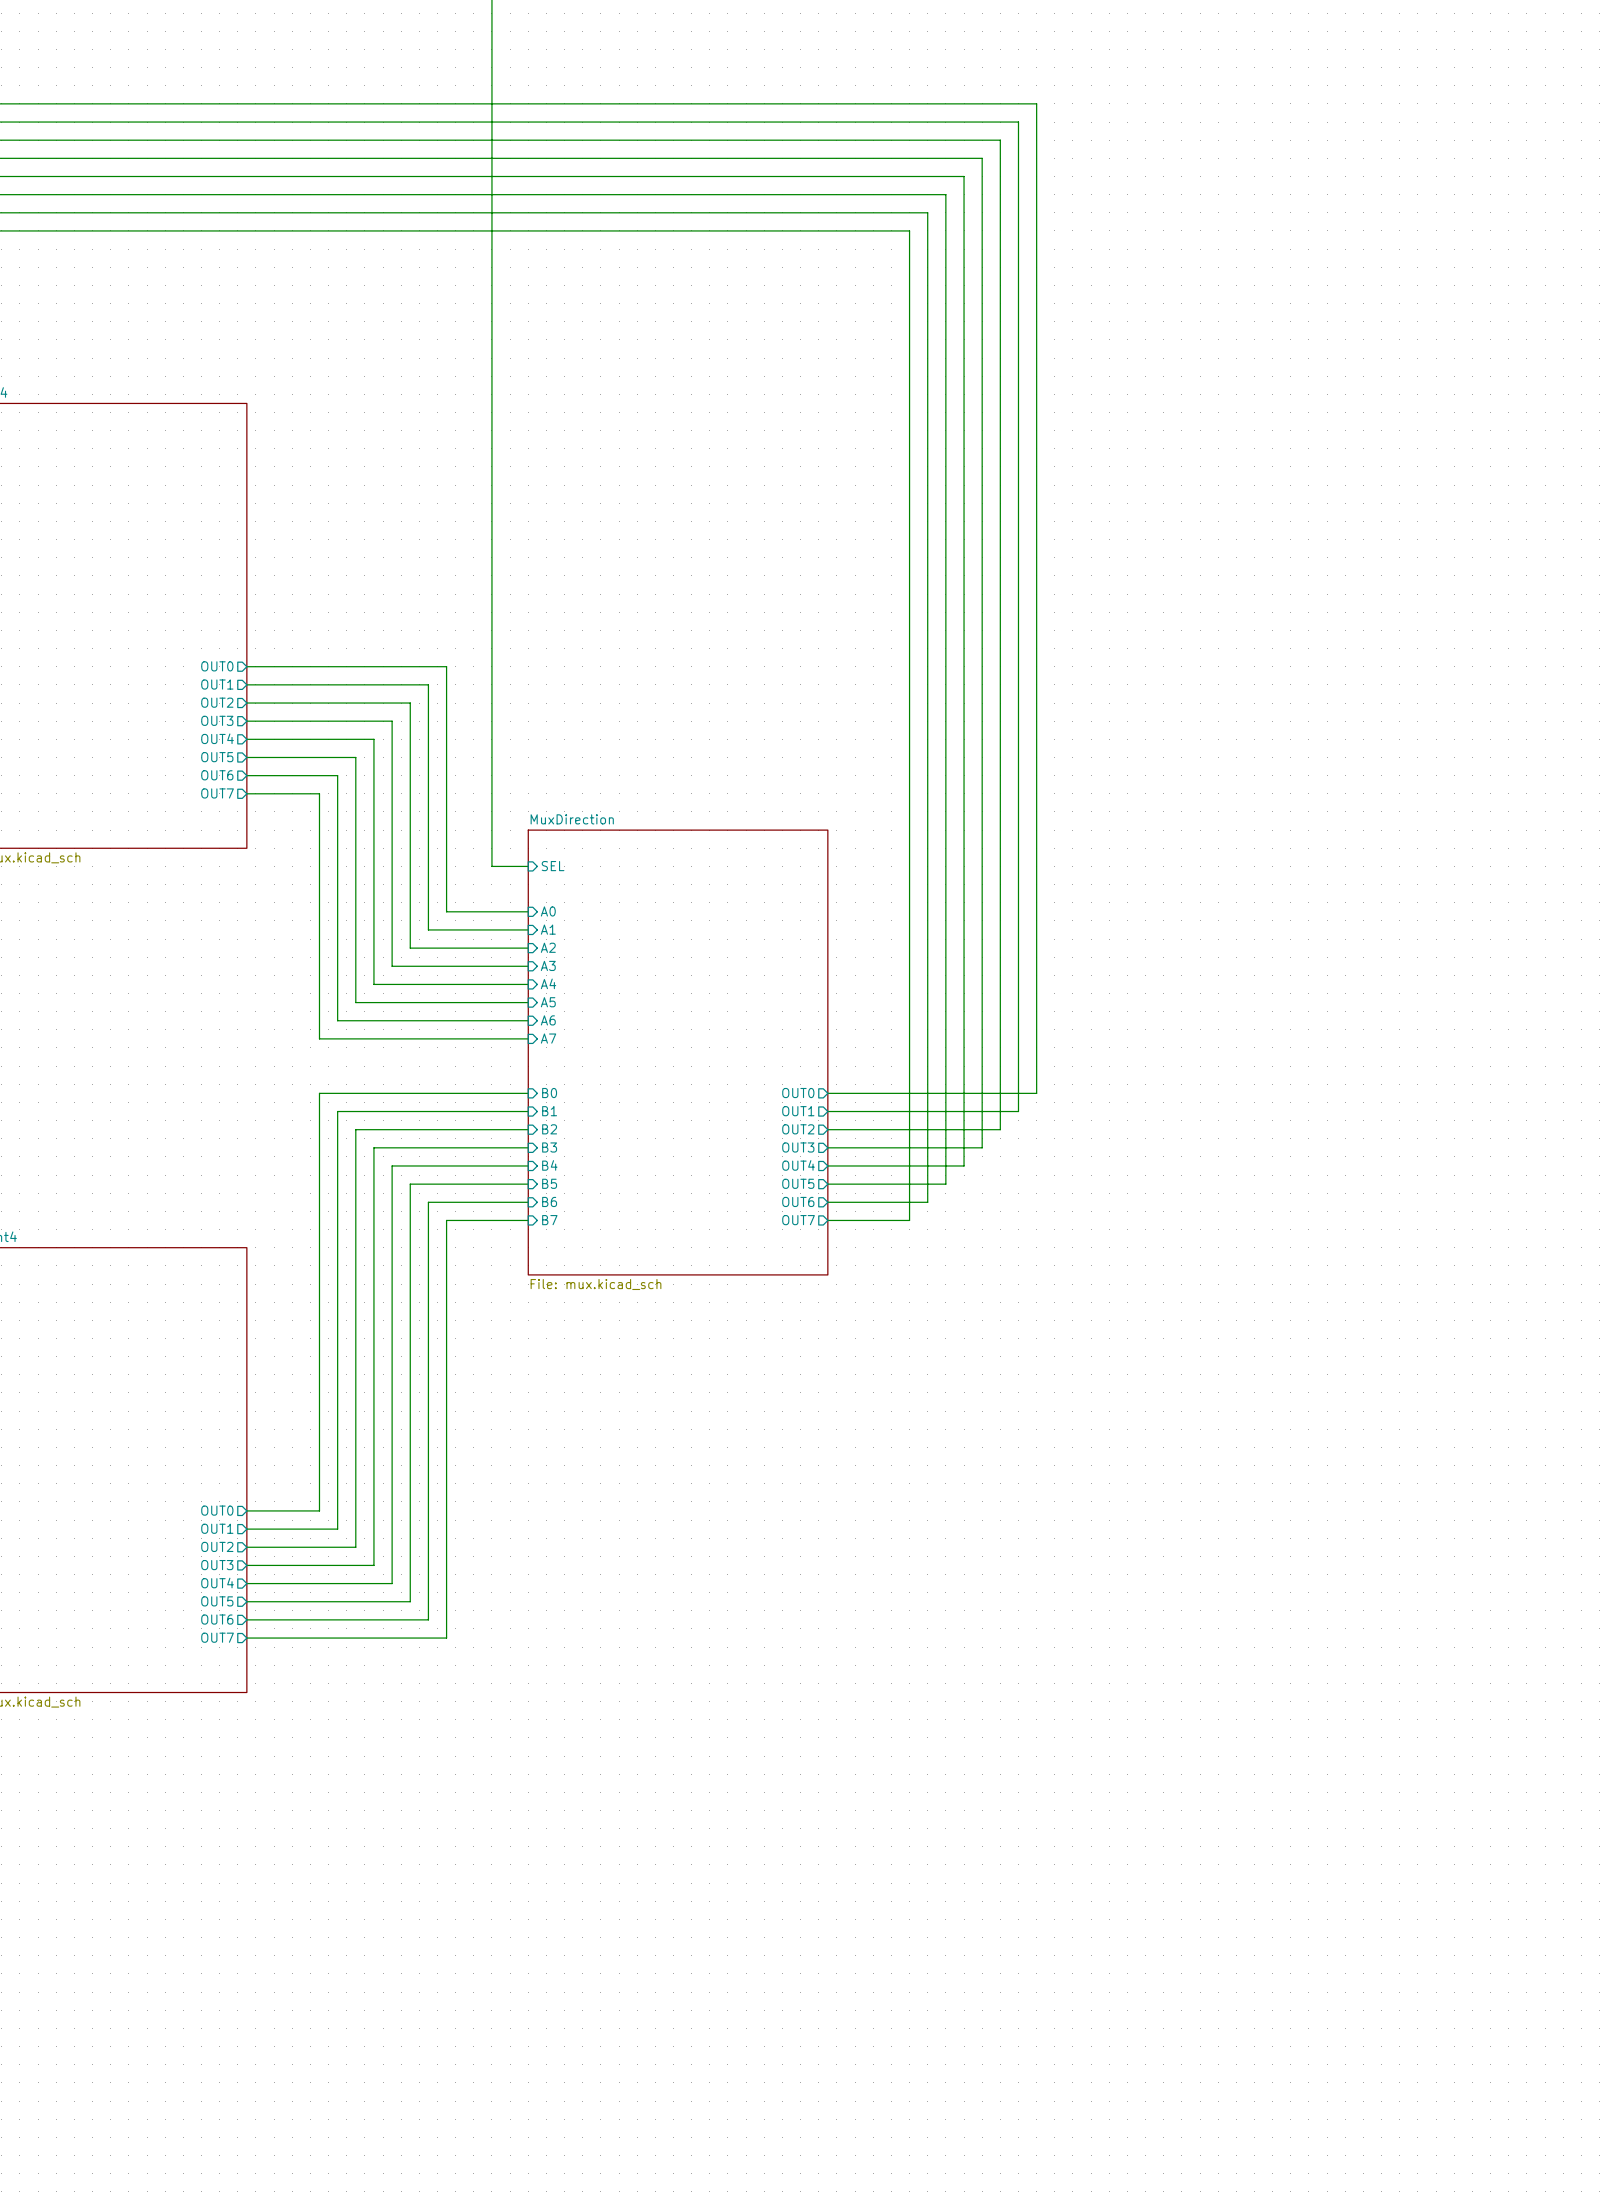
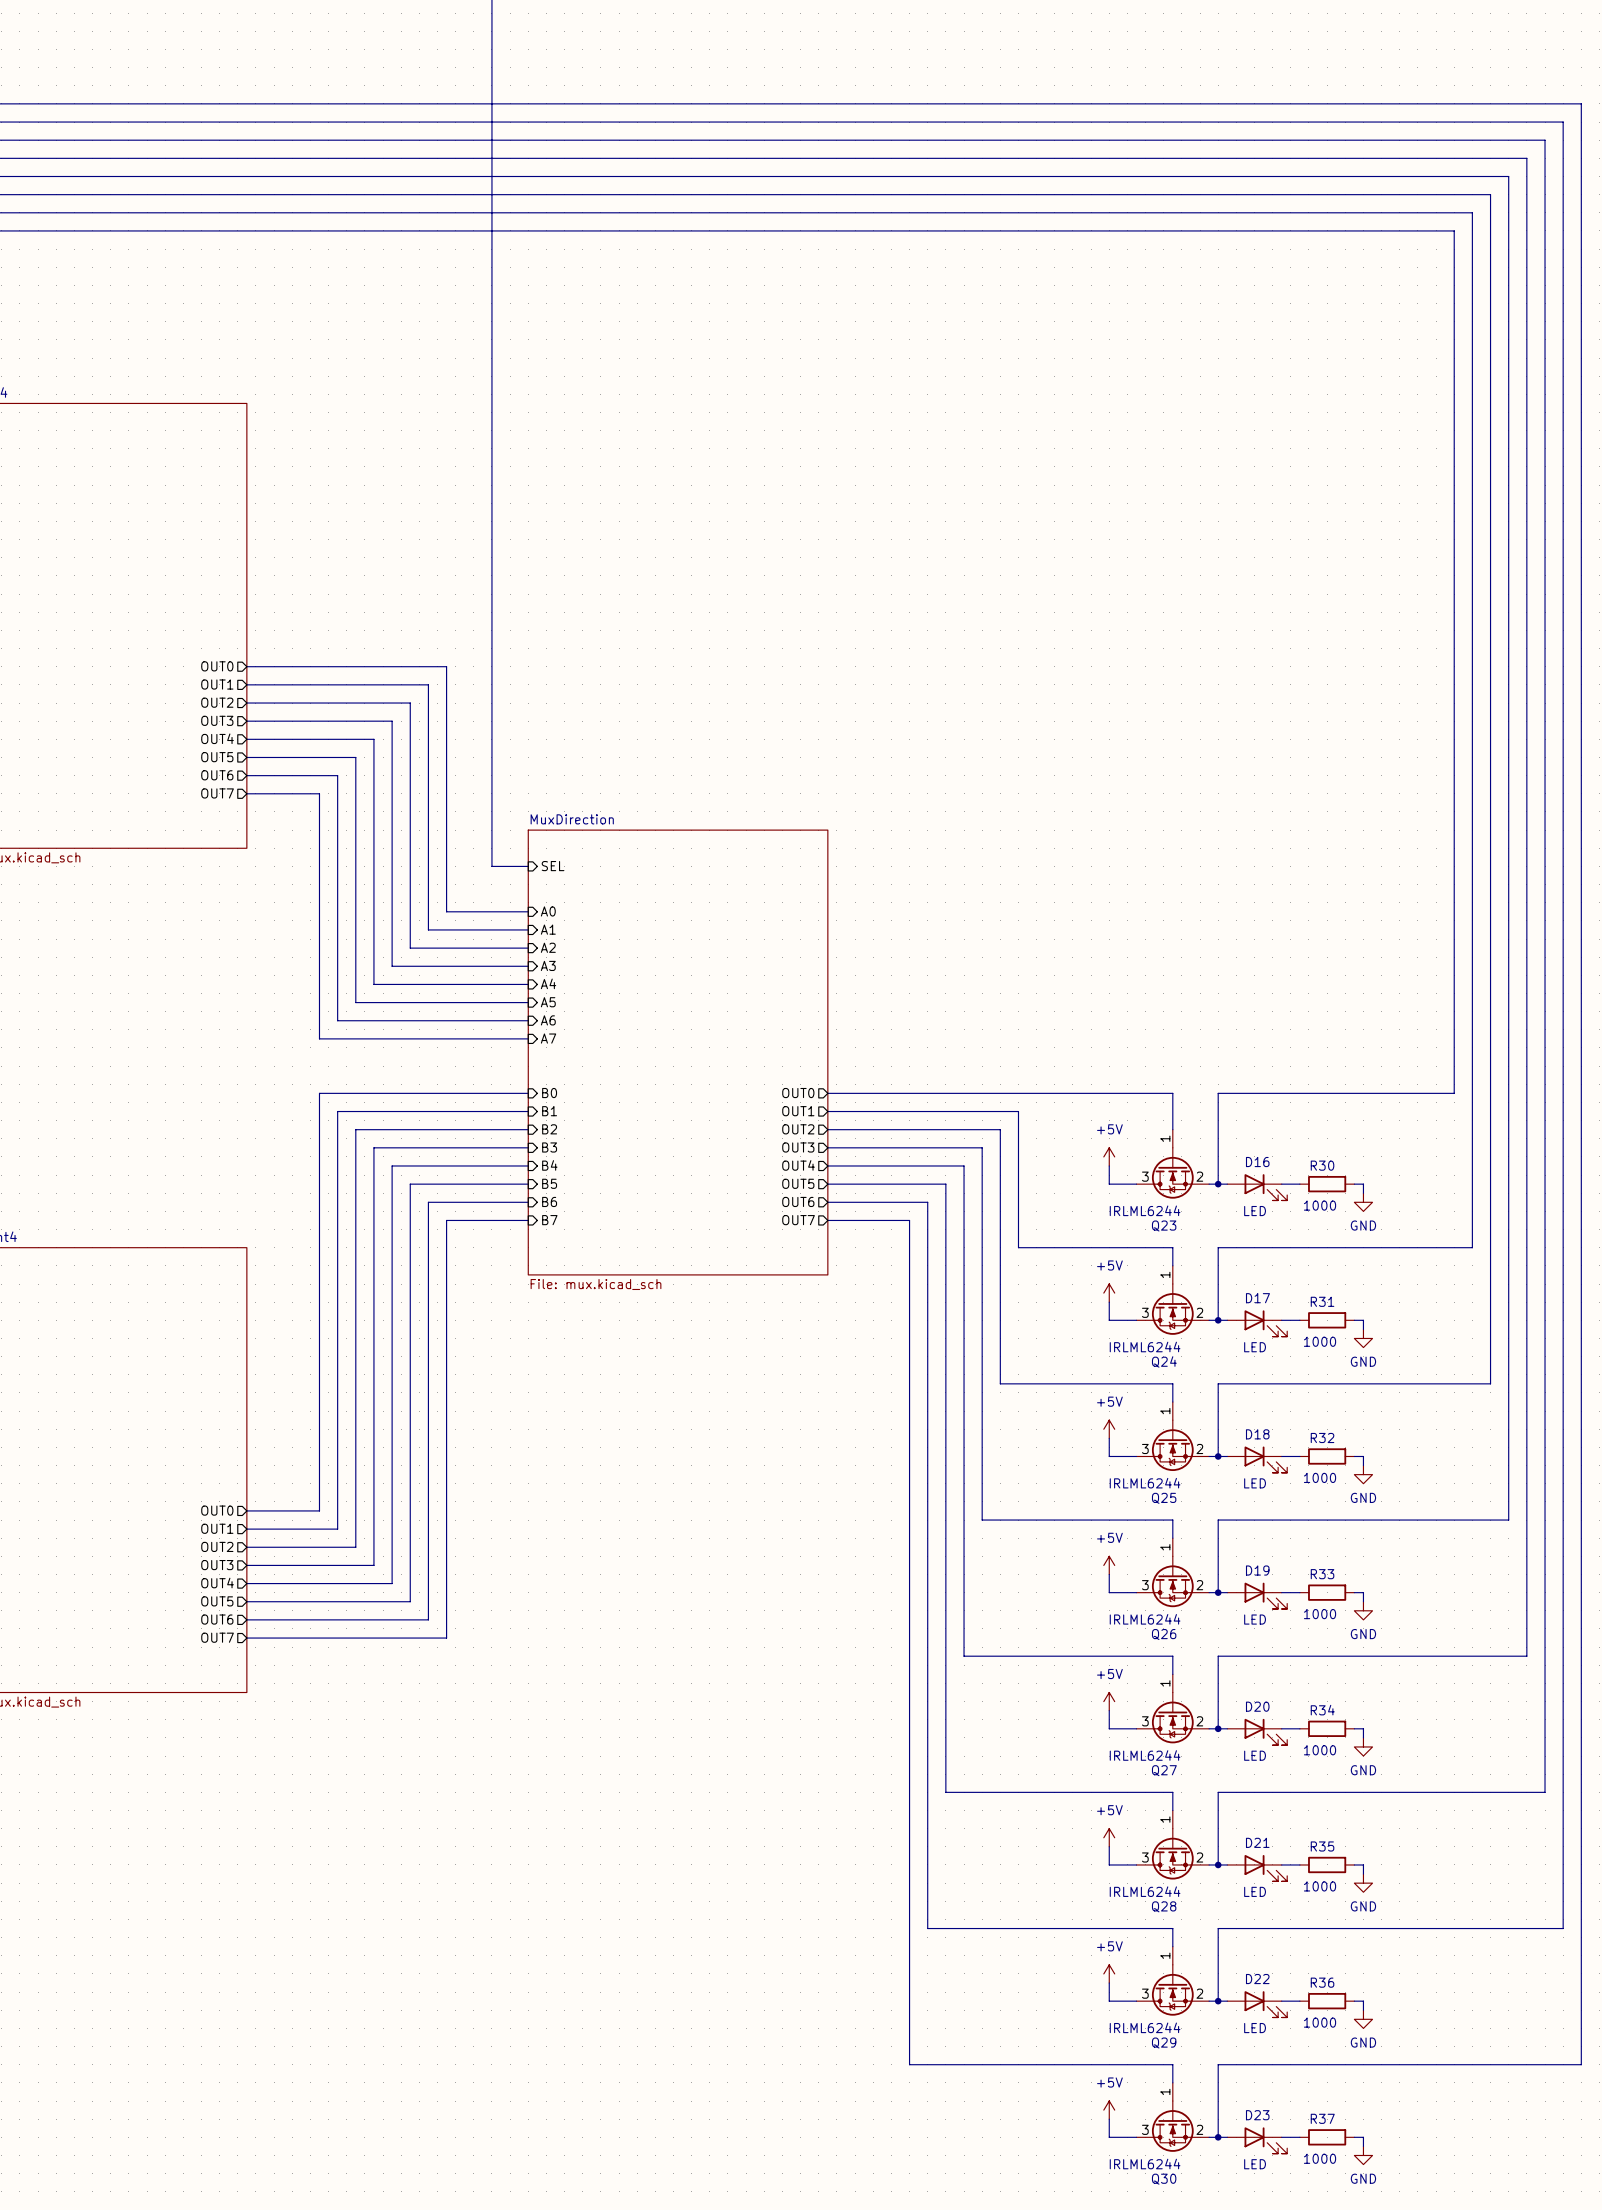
wire: (1036, 103) (1036, 1093) -> (1172, 1129) (1172, 1093) (1036, 1093)
wire: none -> (1036, 103) (1581, 103) (1581, 2064) (1218, 2064) (1218, 2137)
wire: (1018, 122) (1018, 1111) -> (1018, 122) (1563, 122) (1563, 1928) (1218, 1928) (1218, 2001)
wire: (1000, 140) (1000, 1129) -> (1000, 140) (1545, 140) (1545, 1792) (1218, 1792) (1218, 1864)
wire: (982, 158) (982, 1147) -> (982, 158) (1526, 158) (1526, 1656) (1218, 1656) (1218, 1728)
wire: (964, 176) (964, 1165) -> (964, 176) (1508, 176) (1508, 1520) (1218, 1520) (1218, 1592)
wire: (945, 194) (945, 1184) -> (945, 194) (1490, 194) (1490, 1383) (1218, 1383) (1218, 1456)
wire: (927, 212) (927, 1202) -> (927, 212) (1472, 212) (1472, 1247) (1218, 1247) (1218, 1320)
wire: (909, 230) (909, 1220) -> (909, 230) (1454, 230) (1454, 1093) (1218, 1093) (1218, 1184)
wire: none -> (1018, 1111) (1018, 1247) (1172, 1247) (1172, 1265)
wire: none -> (1000, 1129) (1000, 1383) (1172, 1383) (1172, 1402)
wire: none -> (982, 1147) (982, 1520) (1172, 1520) (1172, 1538)
power symbol: none -> +5V (1109, 1156)
Q23: none -> IRLML6244 (1172, 1164)
wire: none -> (964, 1165) (964, 1656) (1172, 1656) (1172, 1674)
wire: none -> (1109, 1165) (1109, 1184) (1136, 1184)
wire: none -> (945, 1184) (945, 1792) (1172, 1792) (1172, 1810)
wire: none -> (1209, 1184) (1227, 1184)
junction: none -> (1218, 1184)
wire: none -> (1281, 1184) (1299, 1184)
R30: none -> 1000 (1327, 1184)
wire: none -> (1354, 1184) (1363, 1184) (1363, 1193)
D16: none -> LED (1257, 1187)
wire: none -> (927, 1202) (927, 1928) (1172, 1928) (1172, 1946)
power symbol: none -> GND (1363, 1202)
wire: none -> (909, 1220) (909, 2064) (1172, 2064) (1172, 2082)
power symbol: none -> +5V (1109, 1293)
Q24: none -> IRLML6244 (1172, 1300)
wire: none -> (1109, 1302) (1109, 1320) (1136, 1320)
wire: none -> (1209, 1320) (1227, 1320)
junction: none -> (1218, 1320)
wire: none -> (1281, 1320) (1299, 1320)
R31: none -> 1000 (1327, 1320)
wire: none -> (1354, 1320) (1363, 1320) (1363, 1329)
D17: none -> LED (1257, 1323)
power symbol: none -> GND (1363, 1338)
power symbol: none -> +5V (1109, 1429)
Q25: none -> IRLML6244 (1172, 1436)
wire: none -> (1109, 1438) (1109, 1456) (1136, 1456)
wire: none -> (1209, 1456) (1227, 1456)
junction: none -> (1218, 1456)
wire: none -> (1281, 1456) (1299, 1456)
R32: none -> 1000 (1327, 1456)
wire: none -> (1354, 1456) (1363, 1456) (1363, 1465)
D18: none -> LED (1257, 1459)
power symbol: none -> GND (1363, 1474)
power symbol: none -> +5V (1109, 1565)
Q26: none -> IRLML6244 (1172, 1572)
wire: none -> (1109, 1574) (1109, 1592) (1136, 1592)
wire: none -> (1209, 1592) (1227, 1592)
junction: none -> (1218, 1592)
wire: none -> (1281, 1592) (1299, 1592)
R33: none -> 1000 (1327, 1592)
wire: none -> (1354, 1592) (1363, 1592) (1363, 1601)
D19: none -> LED (1257, 1595)
power symbol: none -> GND (1363, 1610)
power symbol: none -> +5V (1109, 1701)
Q27: none -> IRLML6244 (1172, 1708)
wire: none -> (1109, 1710) (1109, 1728) (1136, 1728)
wire: none -> (1209, 1728) (1227, 1728)
junction: none -> (1218, 1728)
wire: none -> (1281, 1728) (1299, 1728)
R34: none -> 1000 (1327, 1728)
wire: none -> (1354, 1728) (1363, 1728) (1363, 1737)
D20: none -> LED (1257, 1731)
power symbol: none -> GND (1363, 1746)
power symbol: none -> +5V (1109, 1837)
Q28: none -> IRLML6244 (1172, 1845)
wire: none -> (1109, 1846) (1109, 1864) (1136, 1864)
wire: none -> (1209, 1864) (1227, 1864)
junction: none -> (1218, 1864)
wire: none -> (1281, 1864) (1299, 1864)
R35: none -> 1000 (1327, 1864)
wire: none -> (1354, 1864) (1363, 1864) (1363, 1874)
D21: none -> LED (1257, 1868)
power symbol: none -> GND (1363, 1883)
power symbol: none -> +5V (1109, 1973)
Q29: none -> IRLML6244 (1172, 1981)
wire: none -> (1109, 1983) (1109, 2001) (1136, 2001)
wire: none -> (1209, 2001) (1227, 2001)
junction: none -> (1218, 2001)
wire: none -> (1281, 2001) (1299, 2001)
R36: none -> 1000 (1327, 2001)
wire: none -> (1354, 2001) (1363, 2001) (1363, 2010)
D22: none -> LED (1257, 2004)
power symbol: none -> GND (1363, 2019)
power symbol: none -> +5V (1109, 2110)
Q30: none -> IRLML6244 (1172, 2117)
wire: none -> (1109, 2119) (1109, 2137) (1136, 2137)
wire: none -> (1209, 2137) (1227, 2137)
junction: none -> (1218, 2137)
wire: none -> (1281, 2137) (1299, 2137)
R37: none -> 1000 (1327, 2137)
wire: none -> (1354, 2137) (1363, 2137) (1363, 2146)
D23: none -> LED (1257, 2140)
power symbol: none -> GND (1363, 2155)

